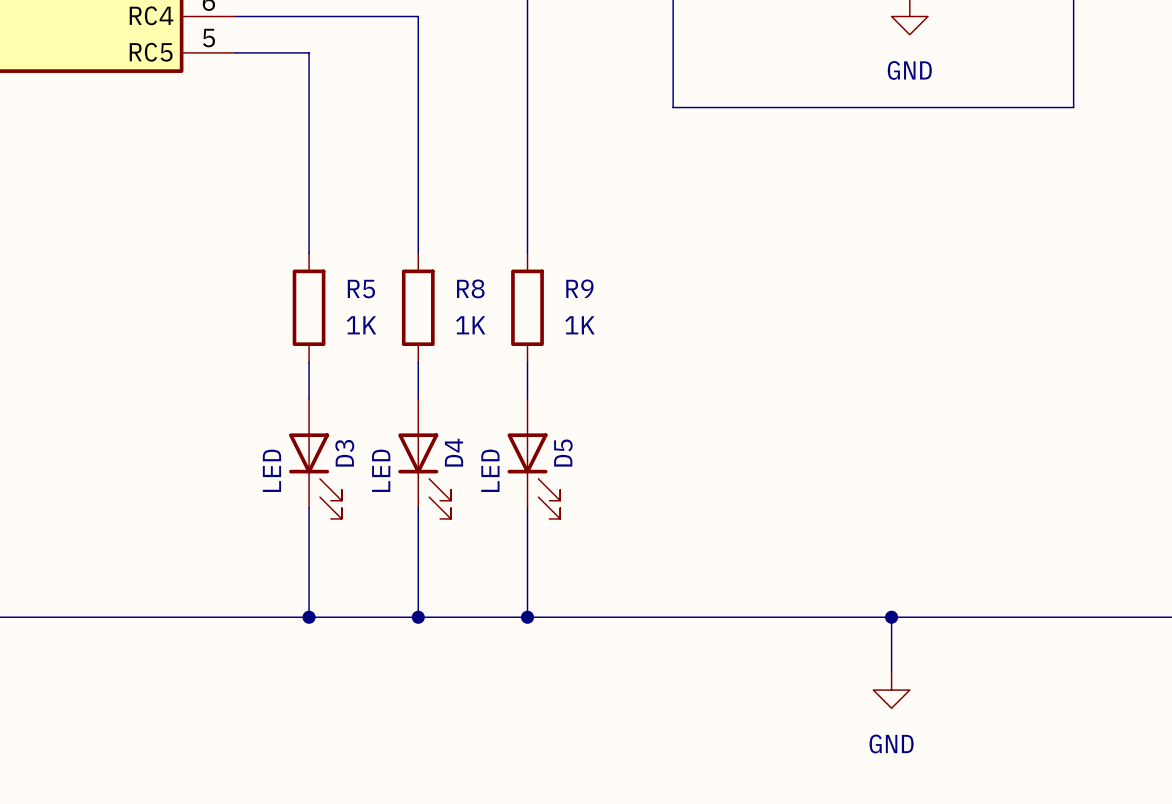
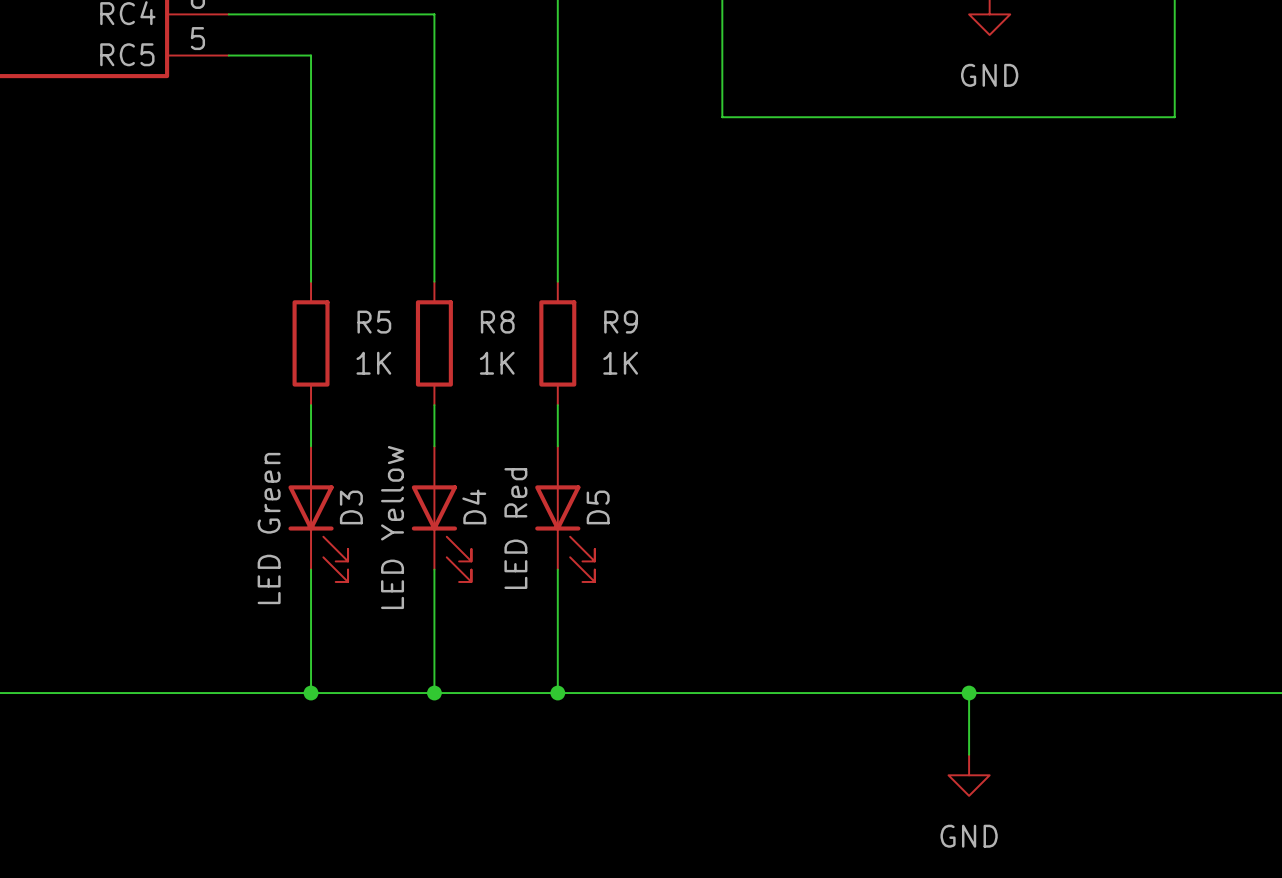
D3 value: LED (271, 470) -> LED Green (269, 528)
D4 value: LED (381, 470) -> LED Yellow (392, 527)
D5 value: LED (490, 470) -> LED Red (515, 528)

